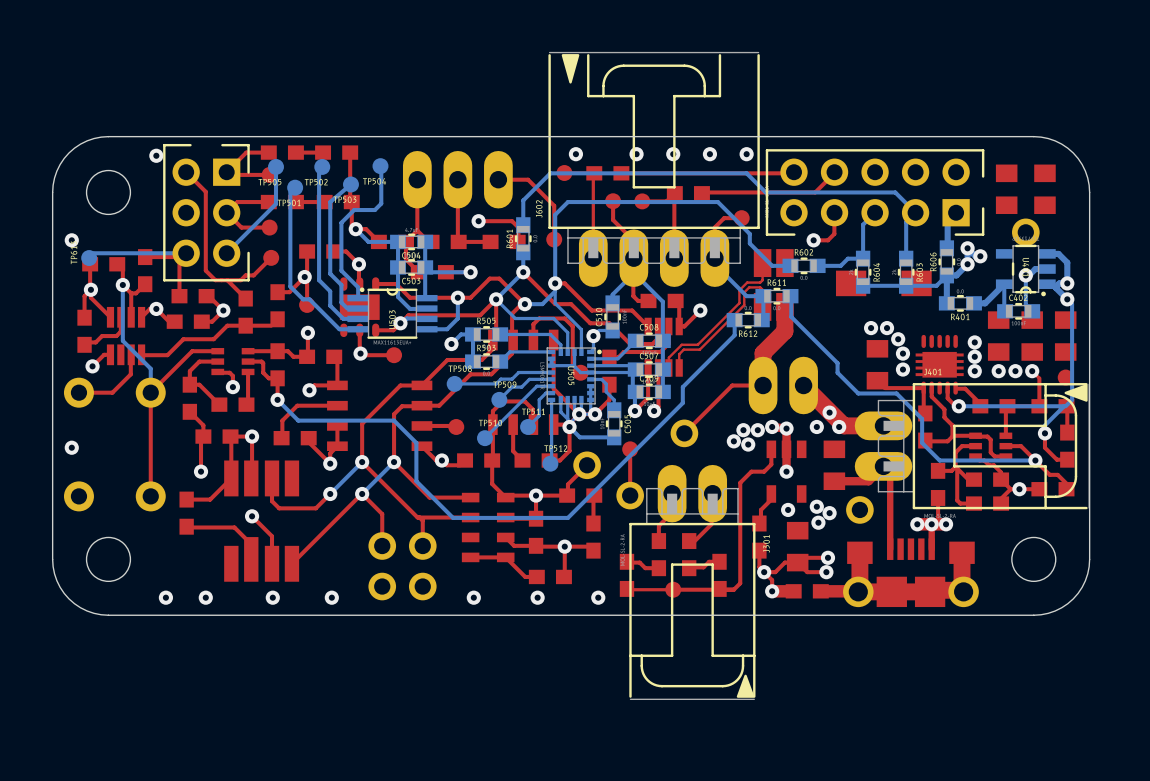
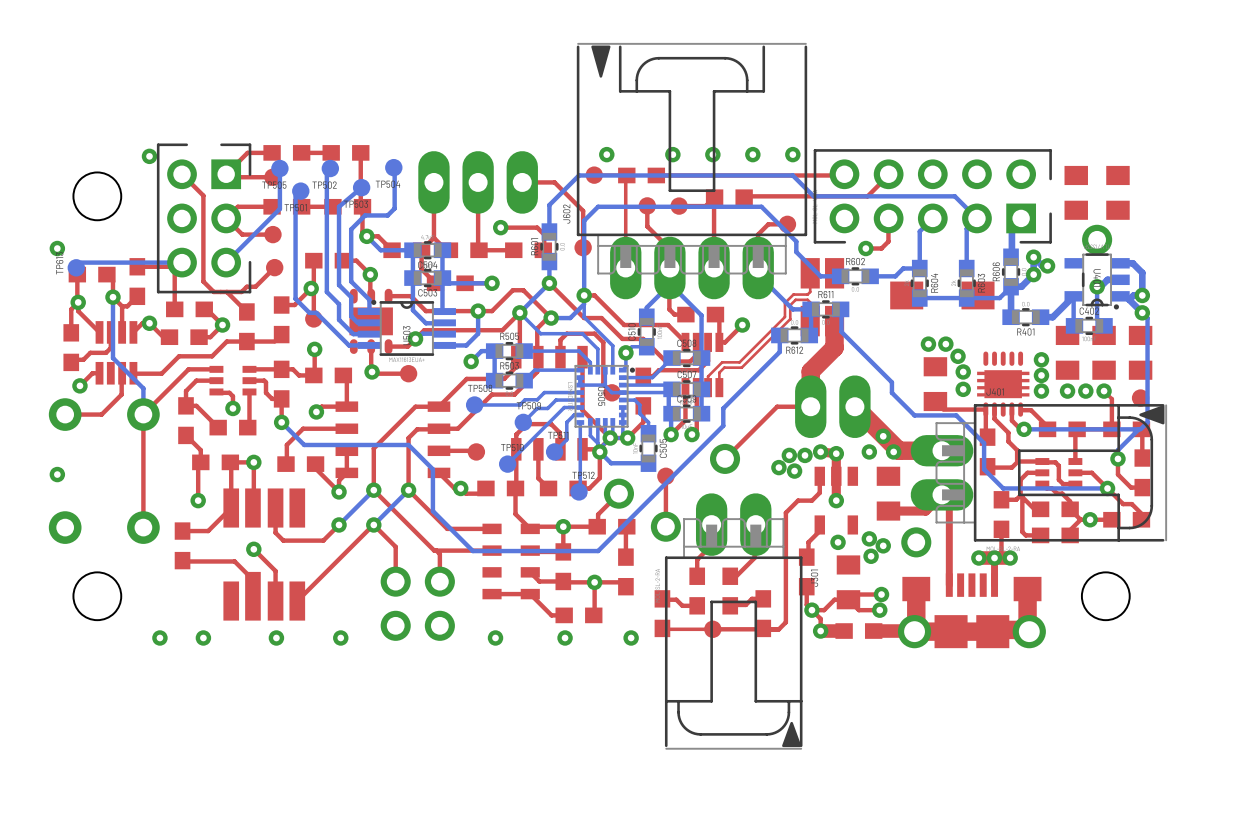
board edge: (1033, 136) (108, 136) (87, 140) (74, 148) (64, 158) (56, 171) (53, 185) (52, 559) (56, 580) (69, 598) (80, 607) (94, 613) (108, 615) (1033, 615) (1055, 610) (1067, 603) (1078, 593) (1085, 580) (1089, 566) (1089, 192) (1085, 171) (1073, 152) (1055, 140) (1033, 136) -> none

